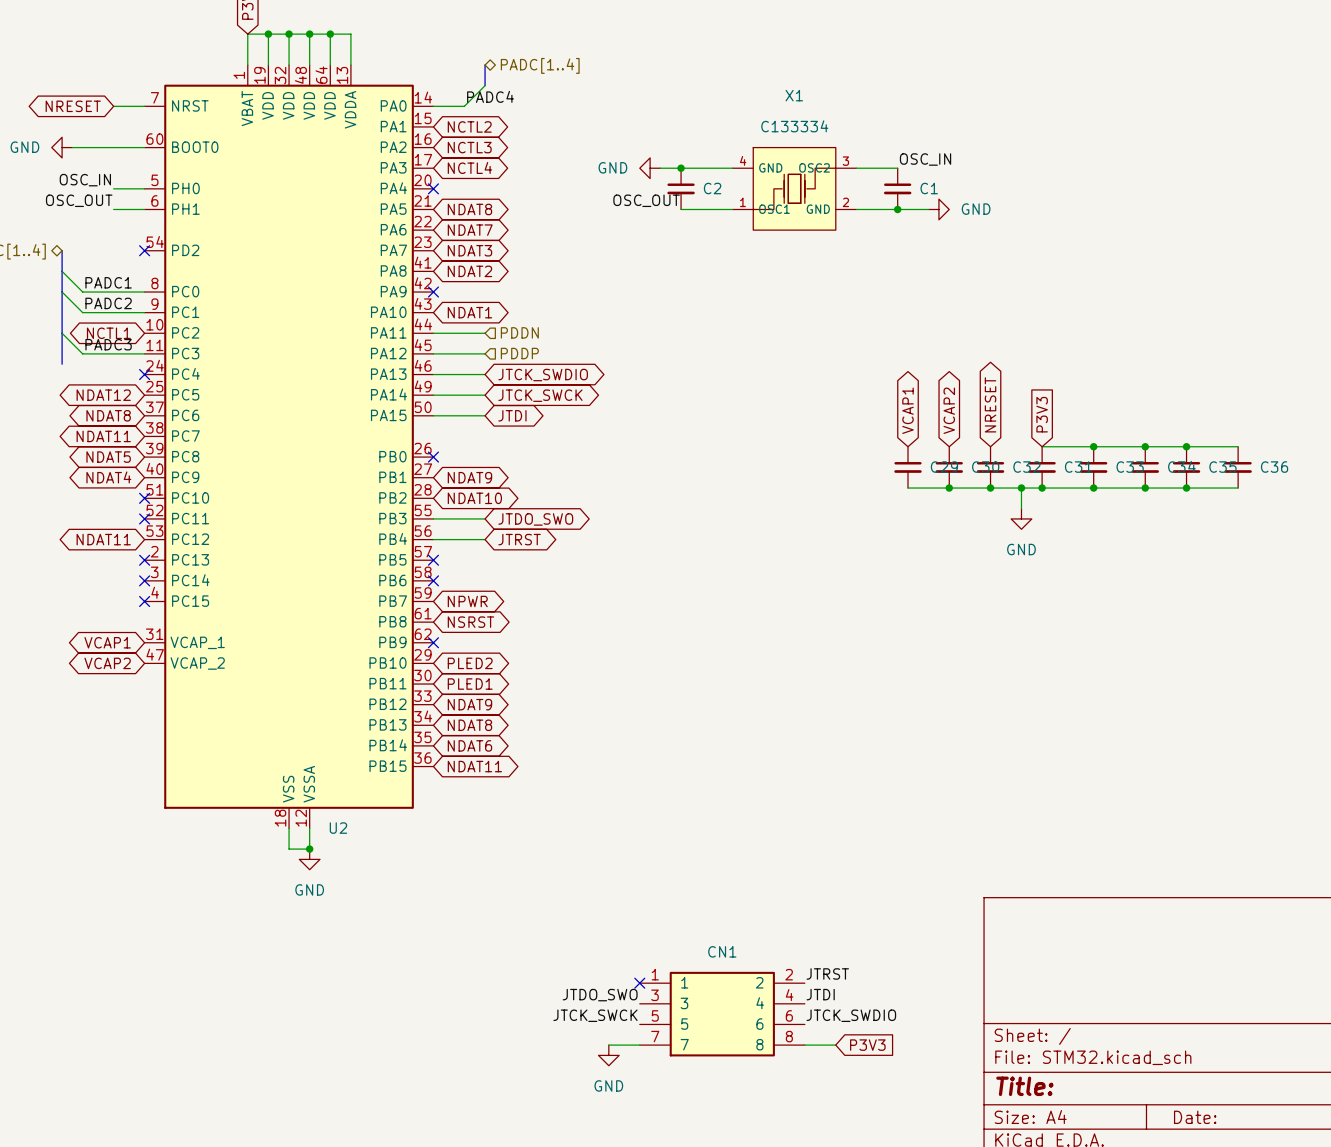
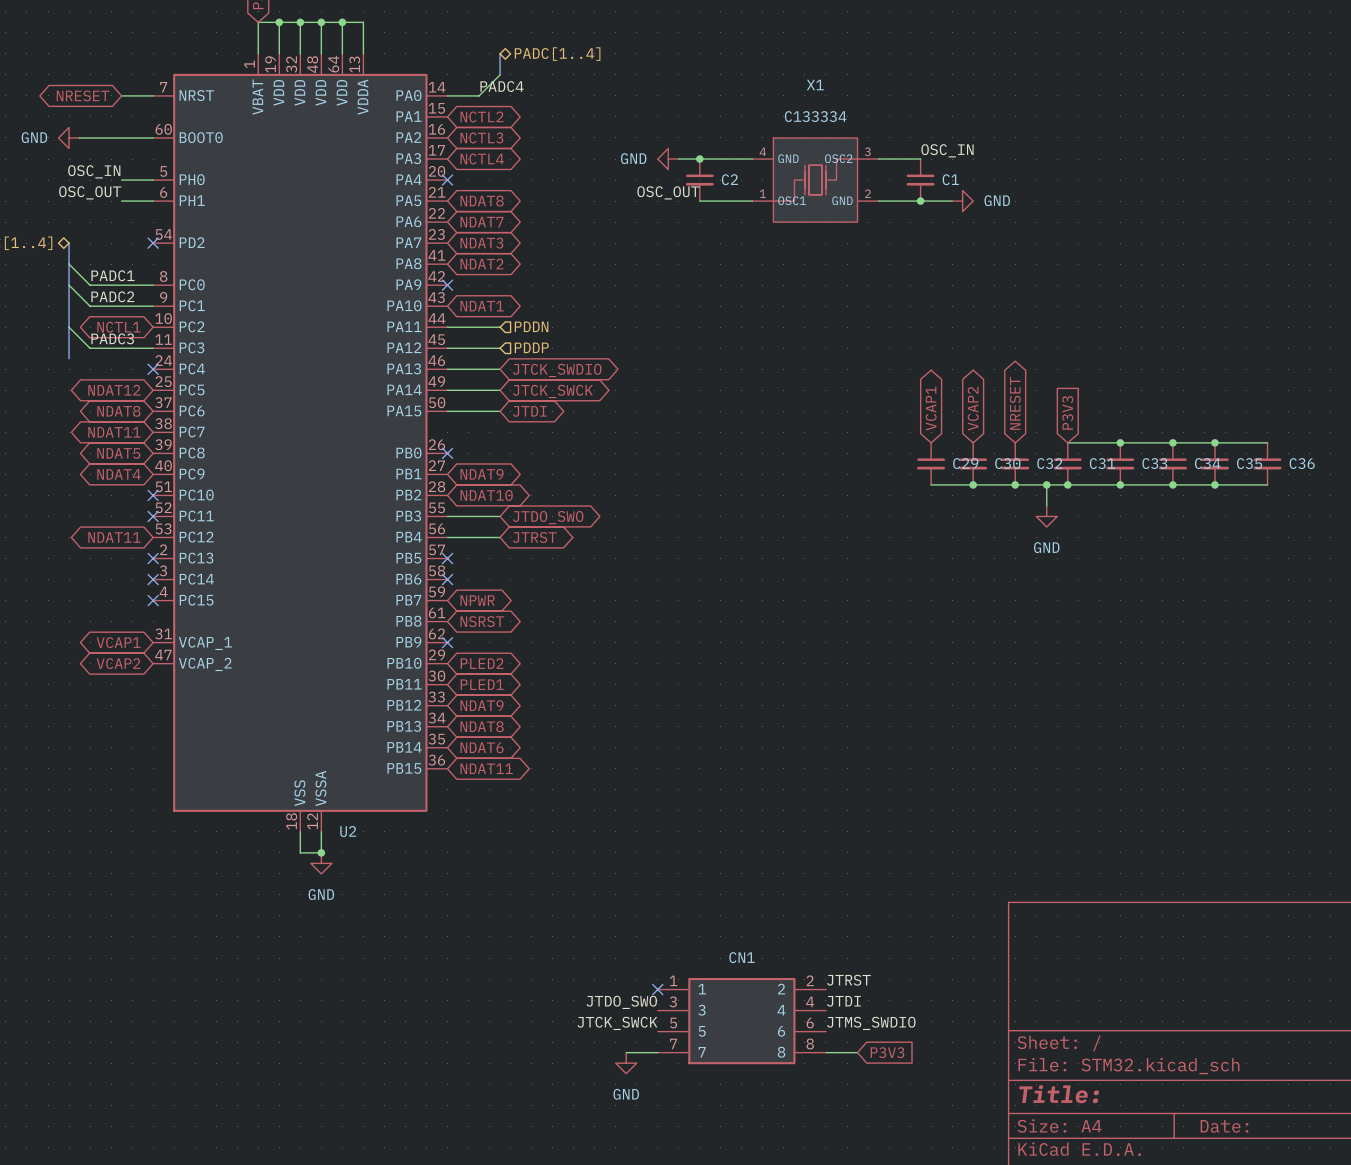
label: JTCK_SWDIO (851, 1015) -> JTMS_SWDIO (871, 1023)

